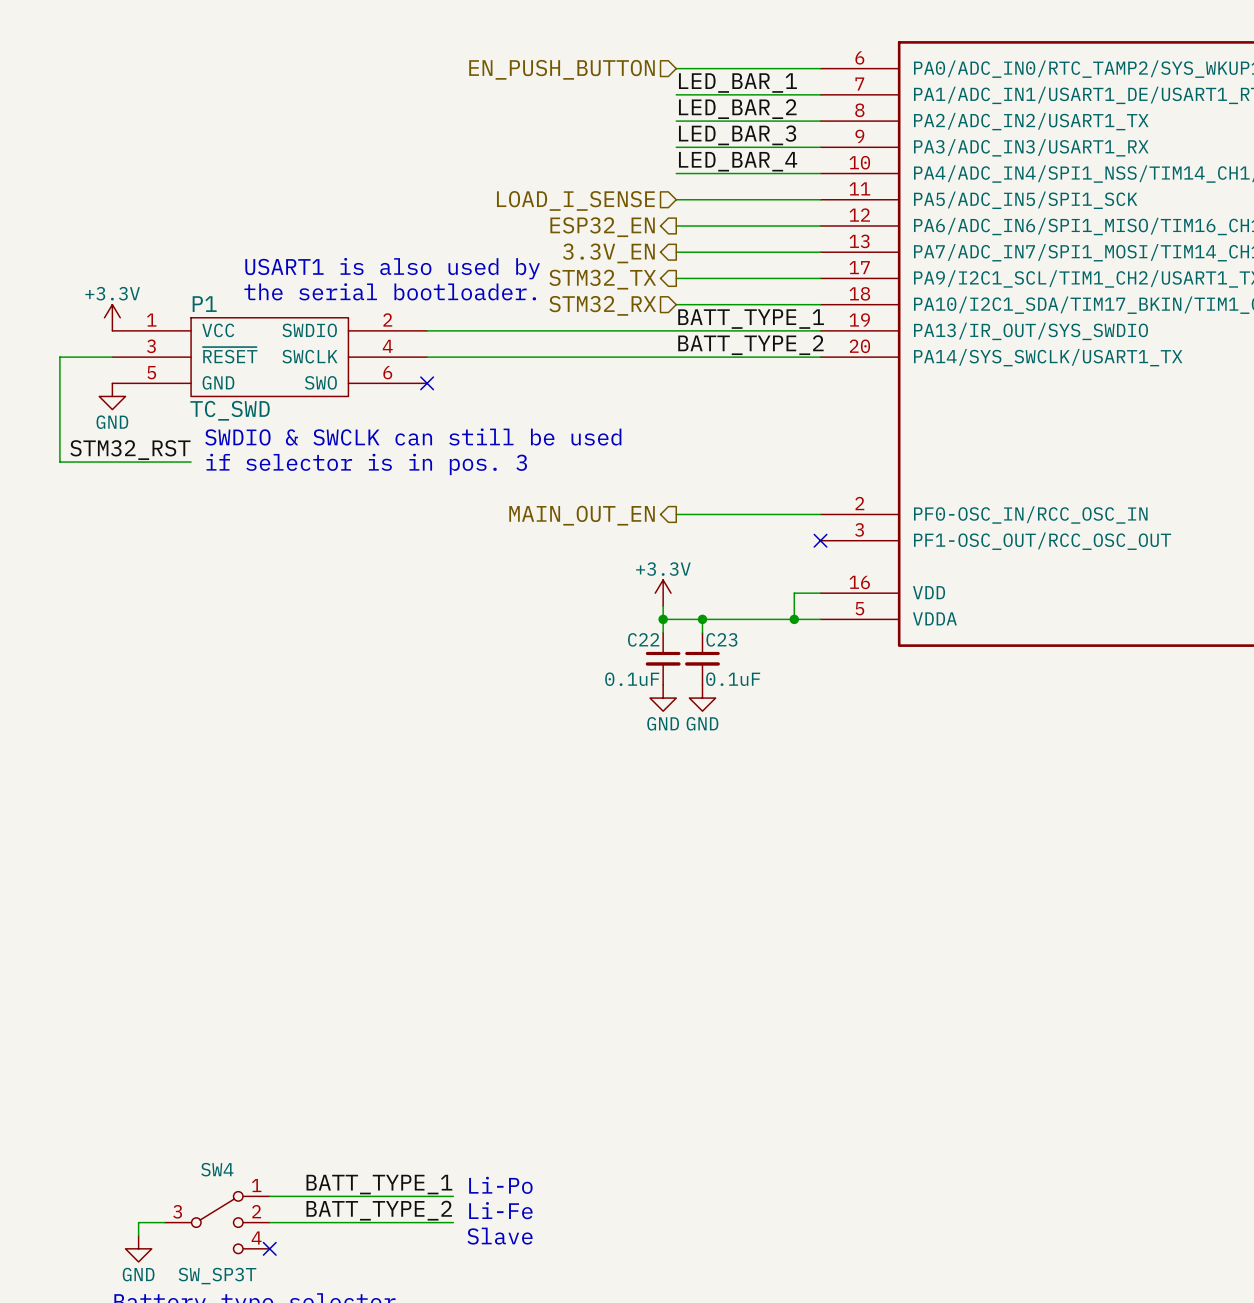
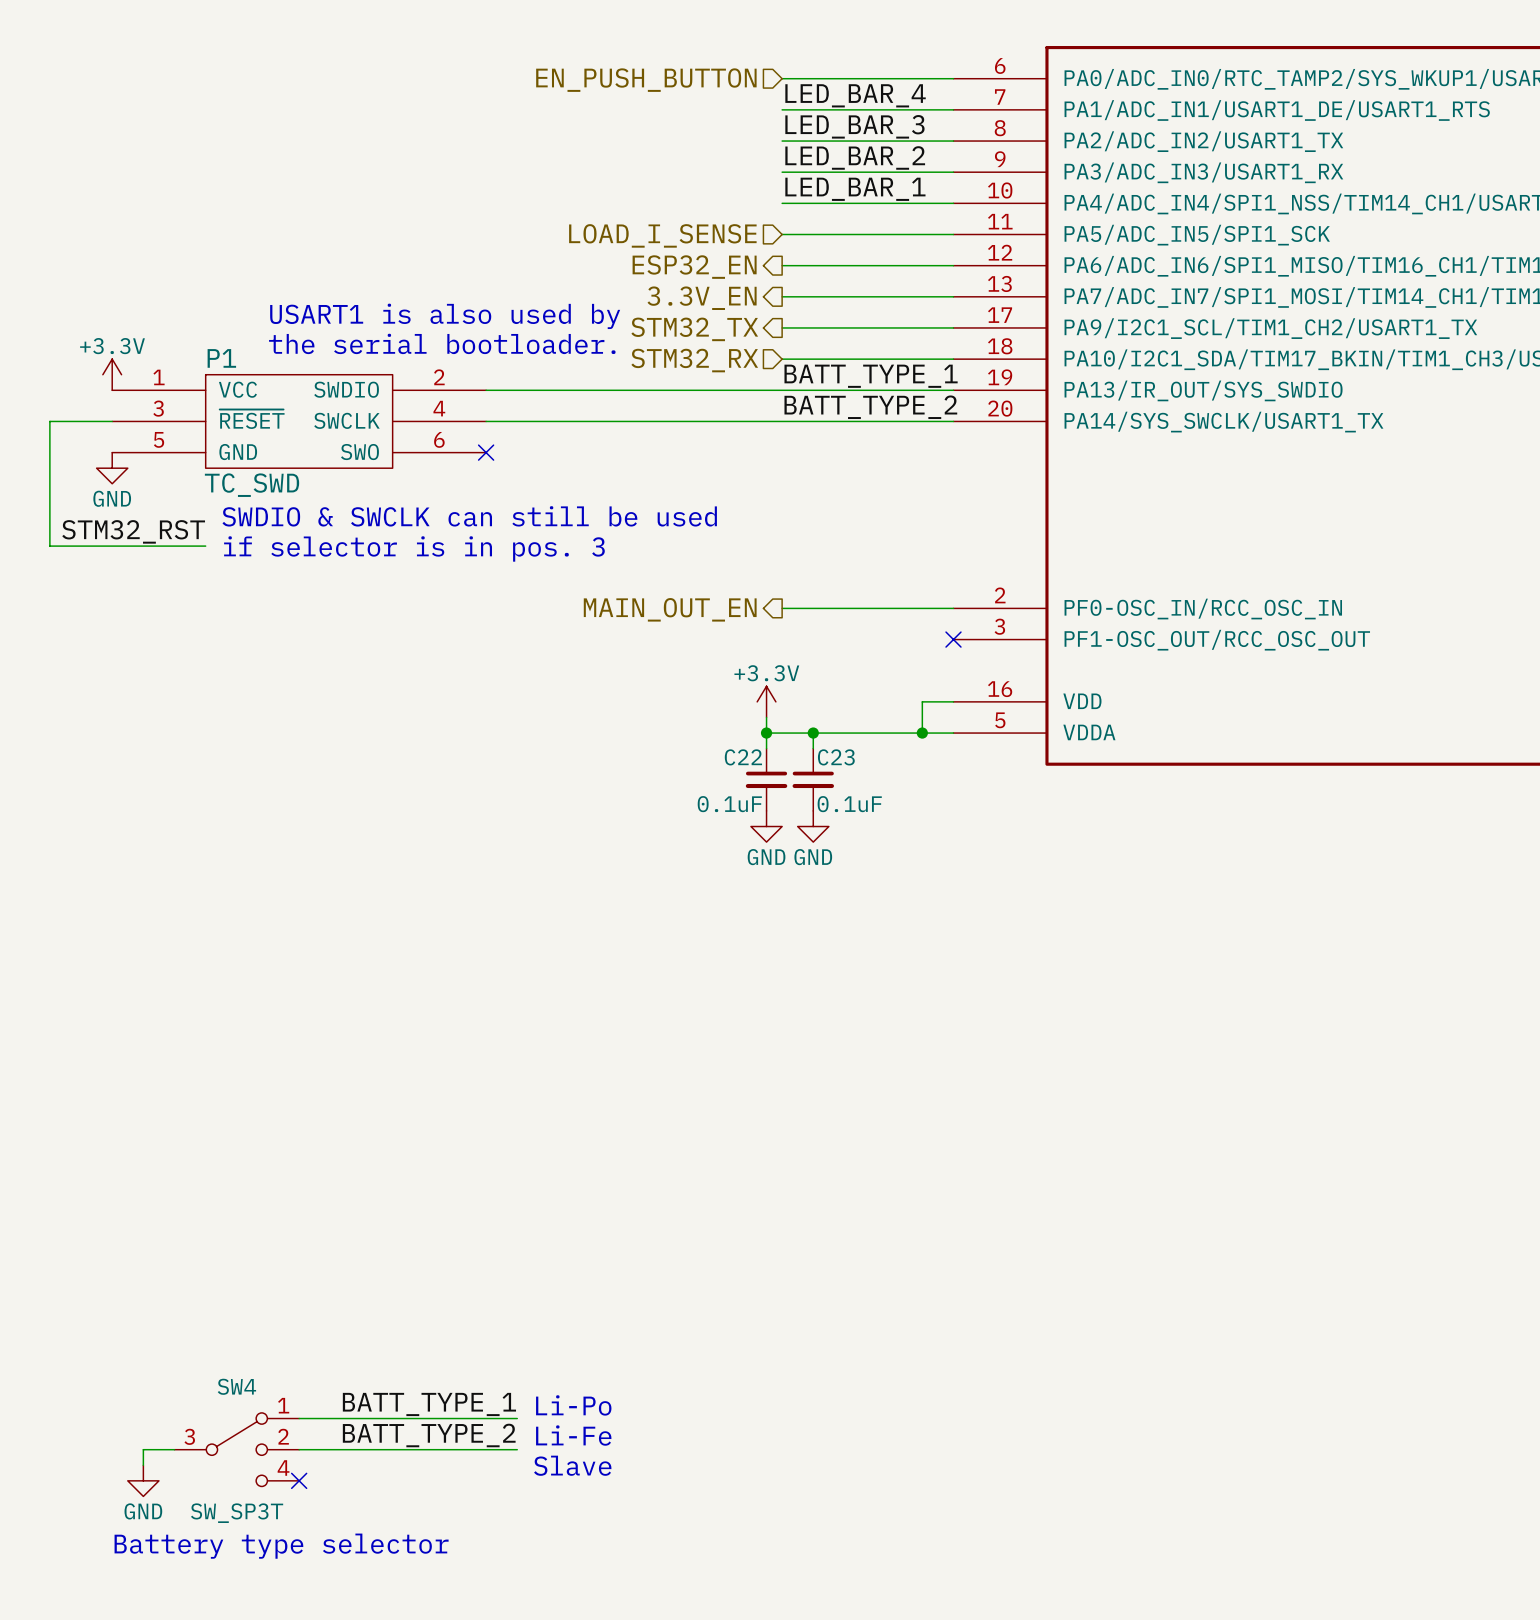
label: LED_BAR_1 (737, 83) -> LED_BAR_4 (855, 95)
label: LED_BAR_2 (737, 109) -> LED_BAR_3 (854, 126)
label: LED_BAR_3 (737, 135) -> LED_BAR_2 (855, 157)
label: LED_BAR_4 (738, 161) -> LED_BAR_1 (855, 189)

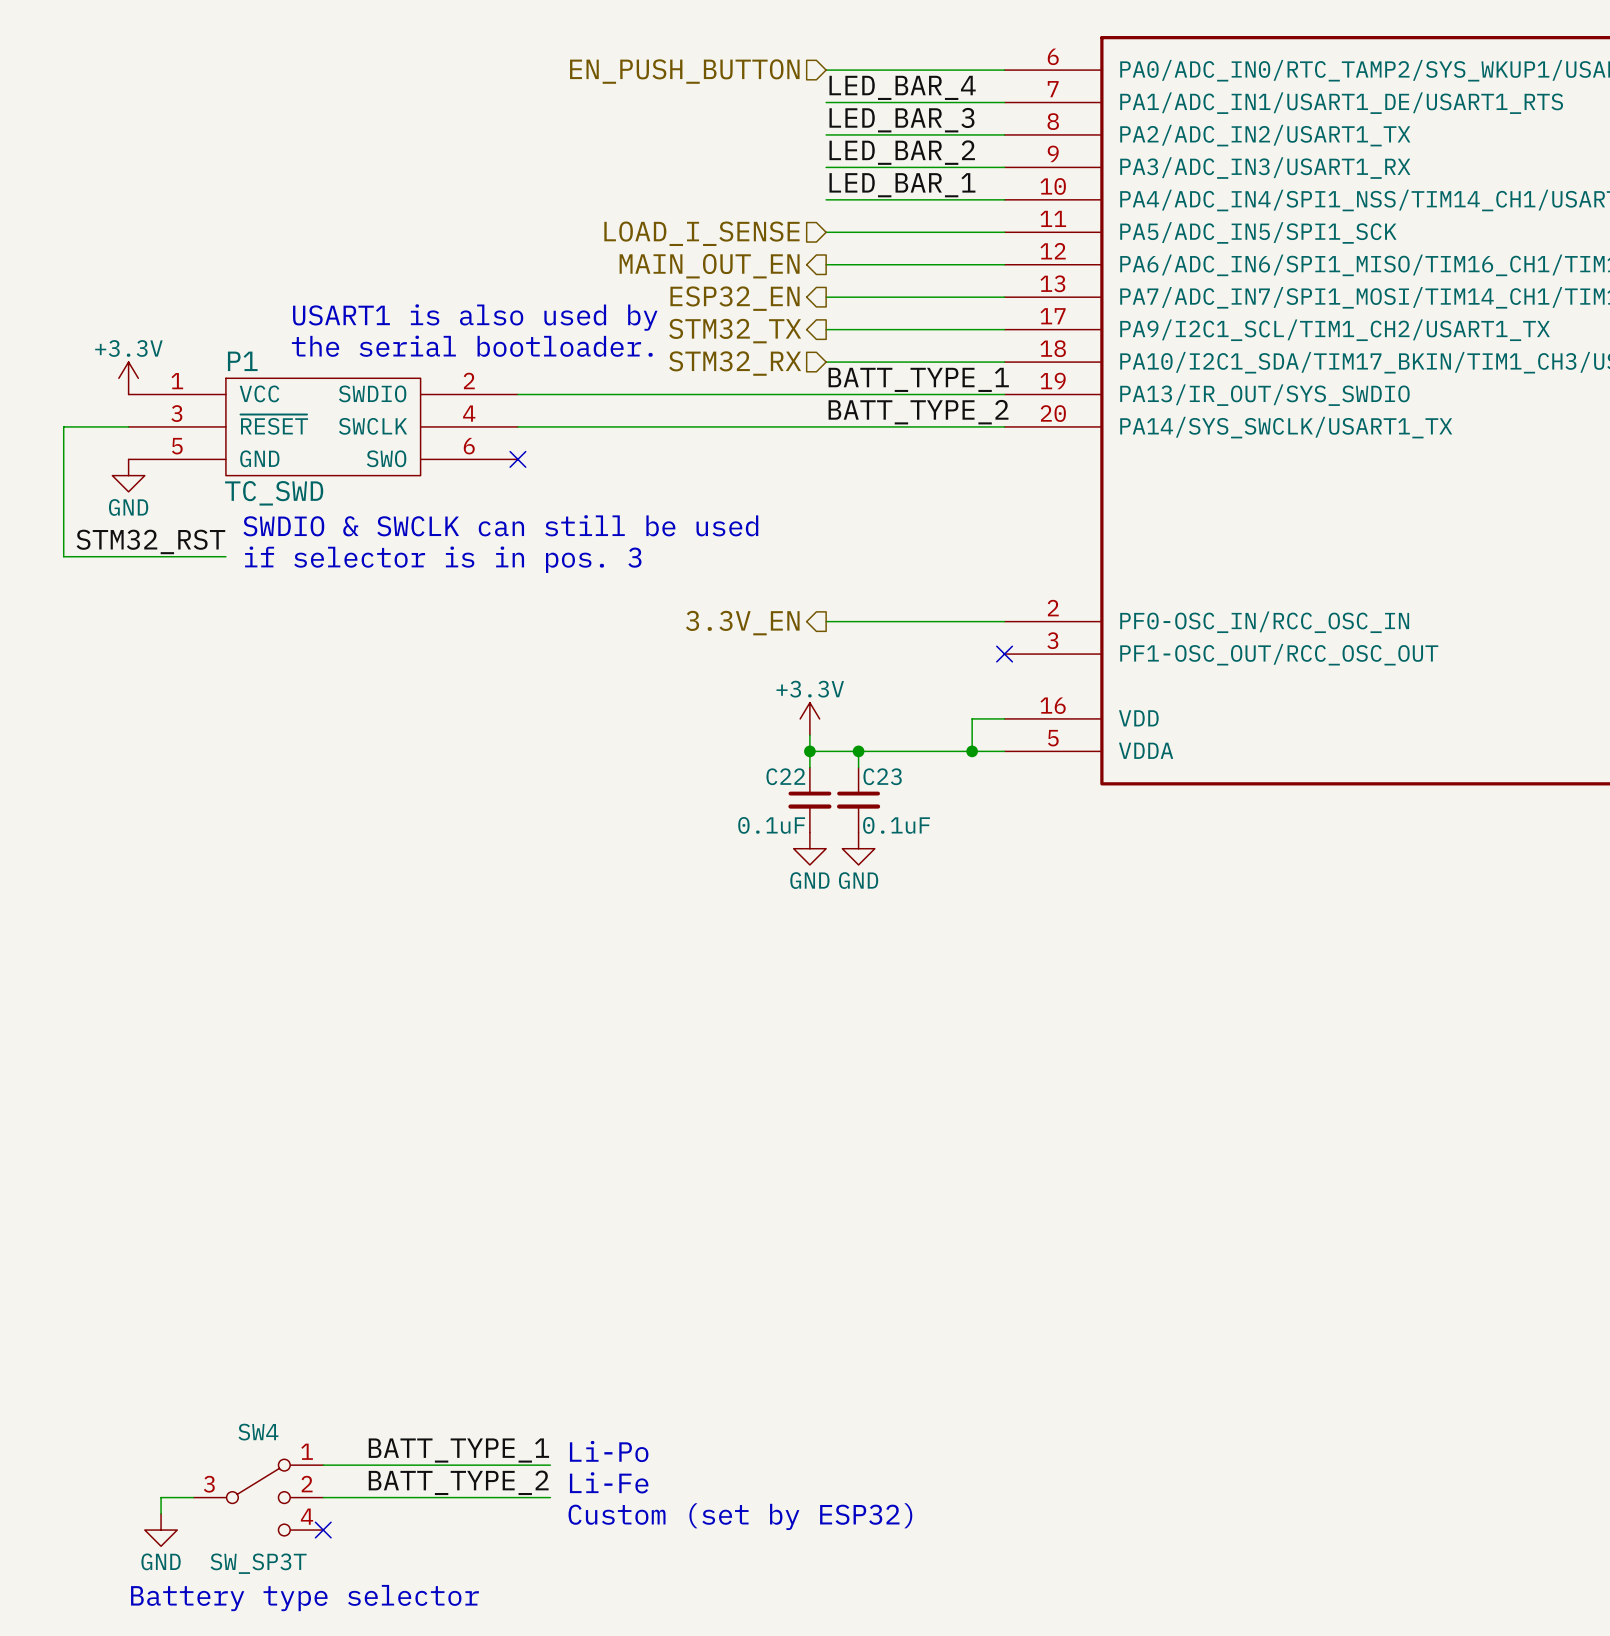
hierarchical label: ESP32_EN (694, 267) -> MAIN_OUT_EN (709, 266)
hierarchical label: 3.3V_EN (702, 298) -> ESP32_EN (735, 298)
hierarchical label: MAIN_OUT_EN (670, 609) -> 3.3V_EN (742, 623)
text: Slave (572, 1465) -> Custom (set by ESP32) (740, 1516)

